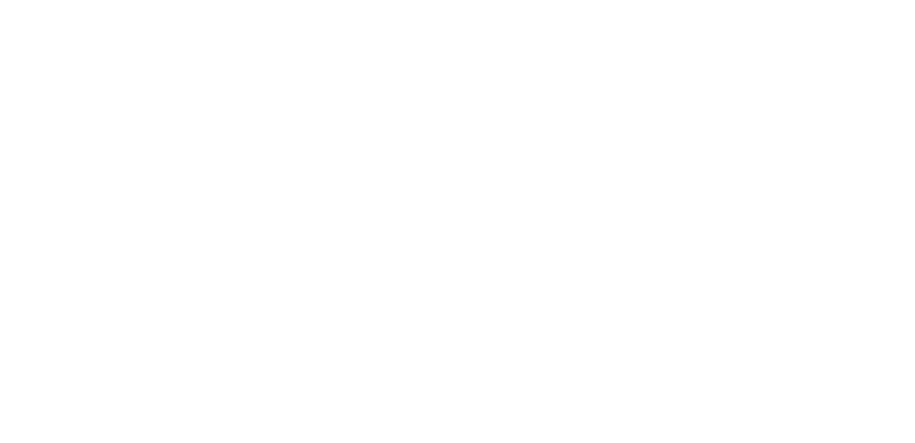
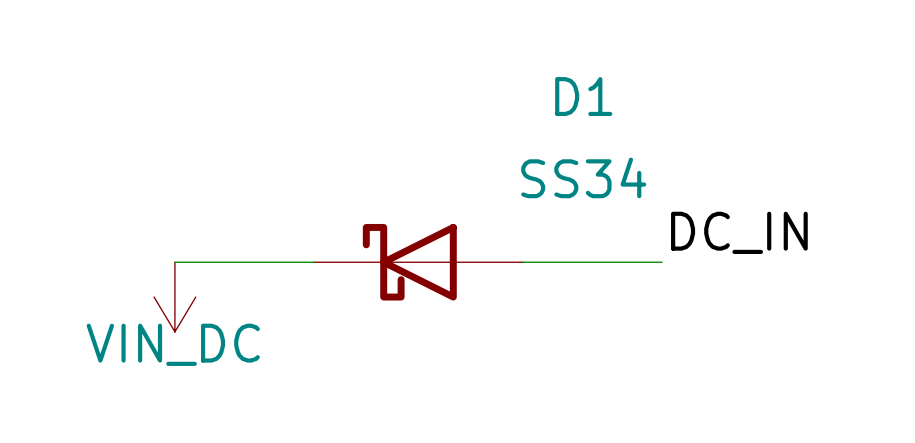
label: none -> DC_IN (739, 232)
wire: none -> (174, 262) (314, 262)
D1: none -> SS34 (418, 262)
wire: none -> (522, 262) (662, 262)
power symbol: none -> VIN_DC (174, 297)

